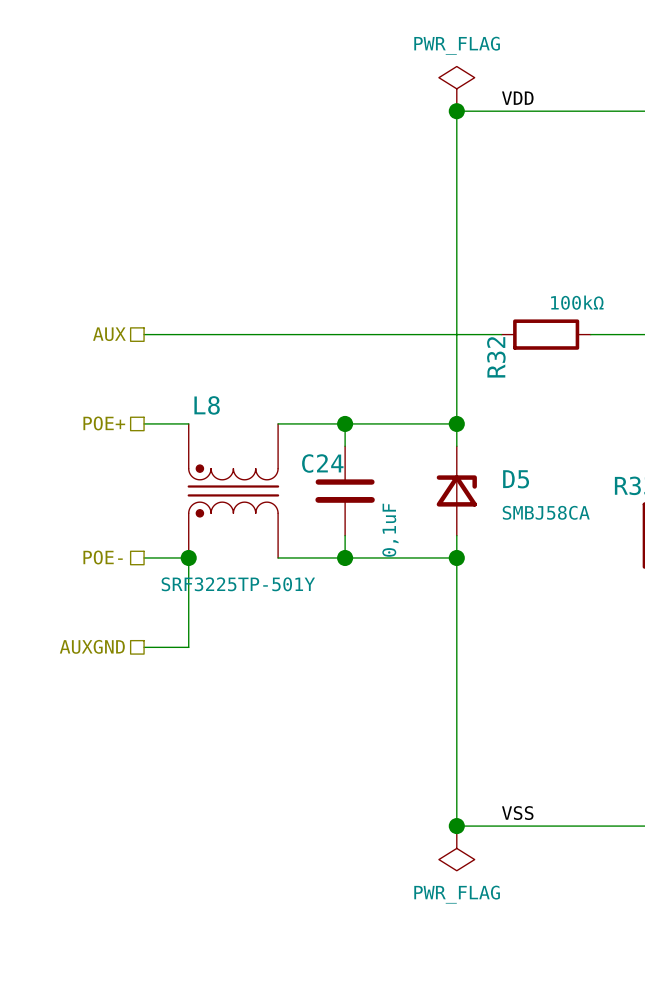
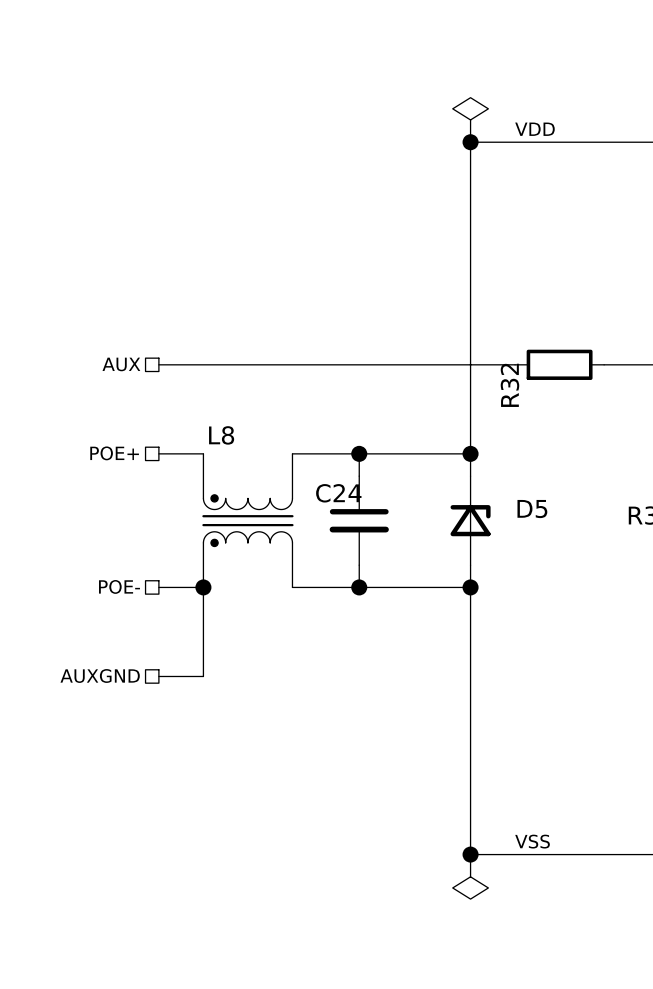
power symbol text: PWR_FLAG (457, 45) -> none
R32 value: 100kΩ (577, 302) -> none
D5 value: SMBJ58CA (546, 512) -> none
C24 value: 0,1uF (390, 530) -> none
L8 value: SRF3225TP-501Y (238, 584) -> none
power symbol text: PWR_FLAG (457, 894) -> none

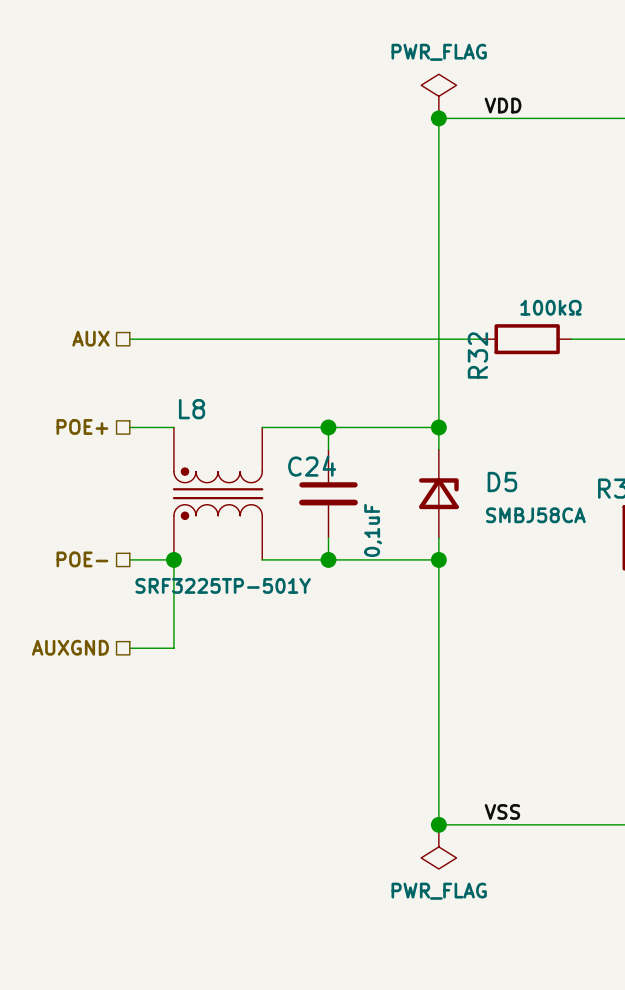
power symbol text: none -> PWR_FLAG (439, 52)
R32 value: none -> 100kΩ (550, 307)
D5 value: none -> SMBJ58CA (535, 515)
C24 value: none -> 0,1uF (373, 530)
L8 value: none -> SRF3225TP-501Y (223, 585)
power symbol text: none -> PWR_FLAG (439, 891)

